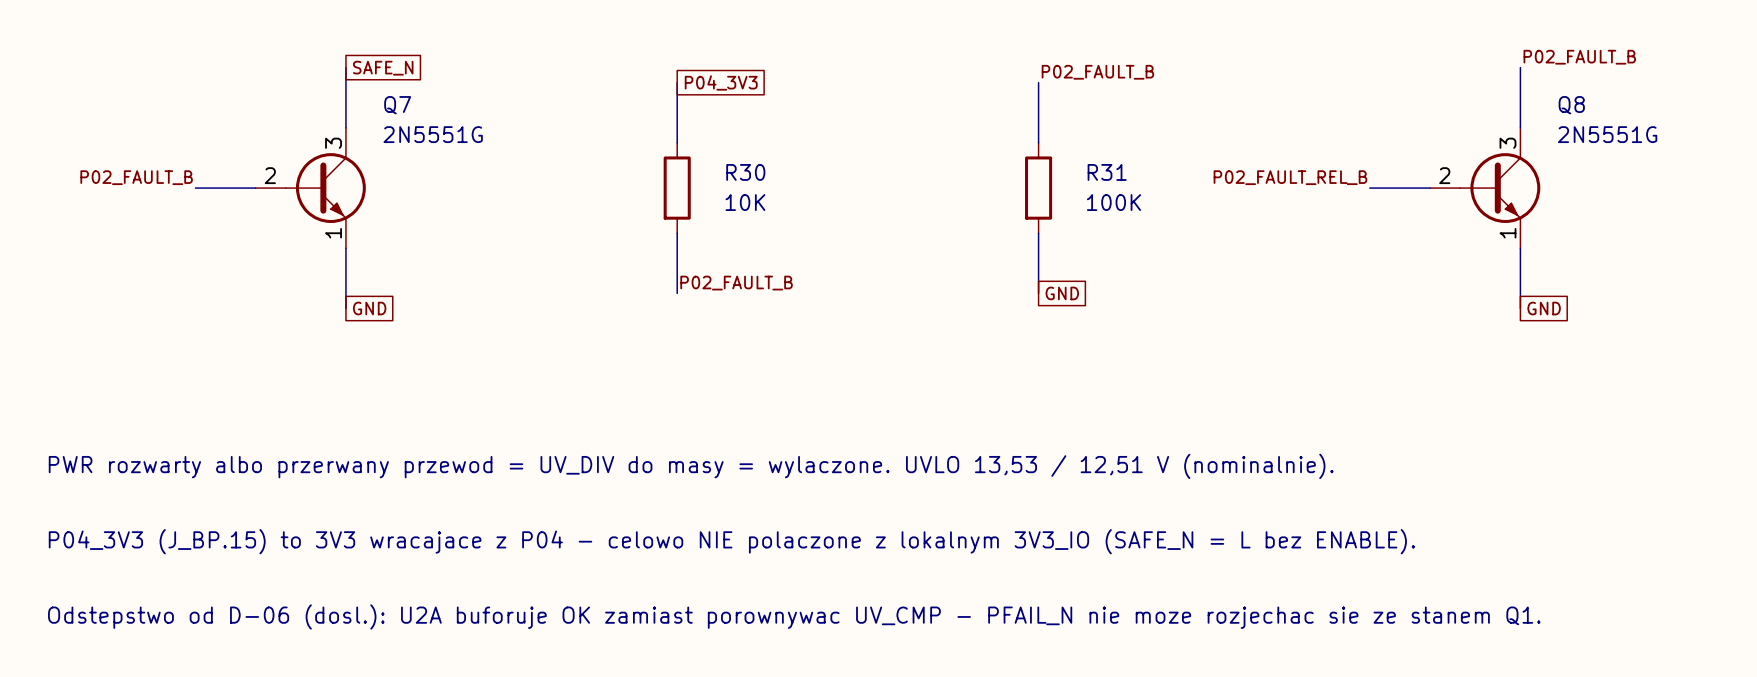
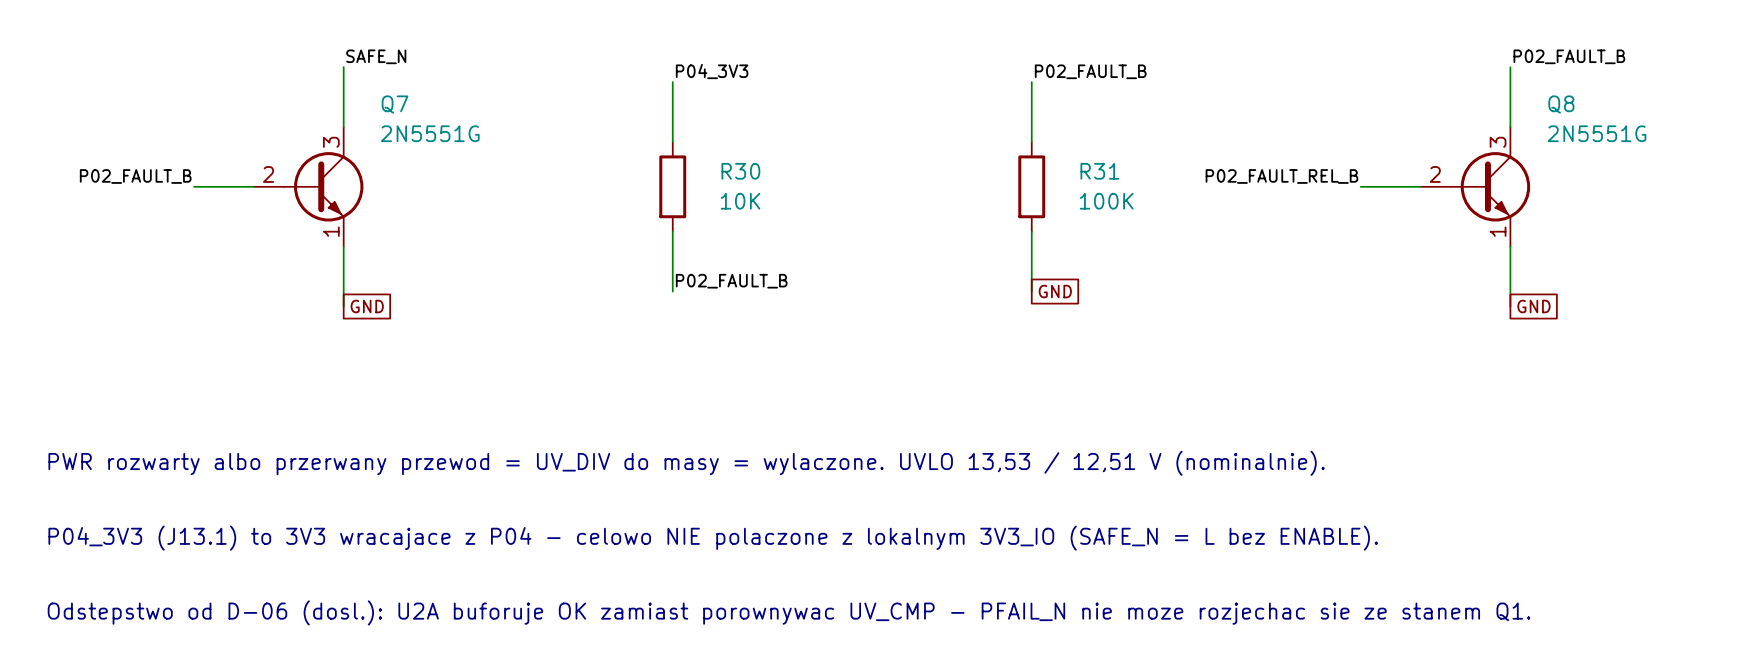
label: none -> SAFE_N (376, 56)
global label: SAFE_N (383, 68) -> none
label: none -> P04_3V3 (712, 71)
global label: P04_3V3 (721, 82) -> none
text: P04_3V3 (J_BP.15) to 3V3 wracajace z P04 - celowo NIE polaczone z lokalnym 3V3_IO (SAFE_N = L bez ENABLE). (731, 541) -> P04_3V3 (J13.1) to 3V3 wracajace z P04 - celowo NIE polaczone z lokalnym 3V3_IO (SAFE_N = L bez ENABLE). (713, 538)

